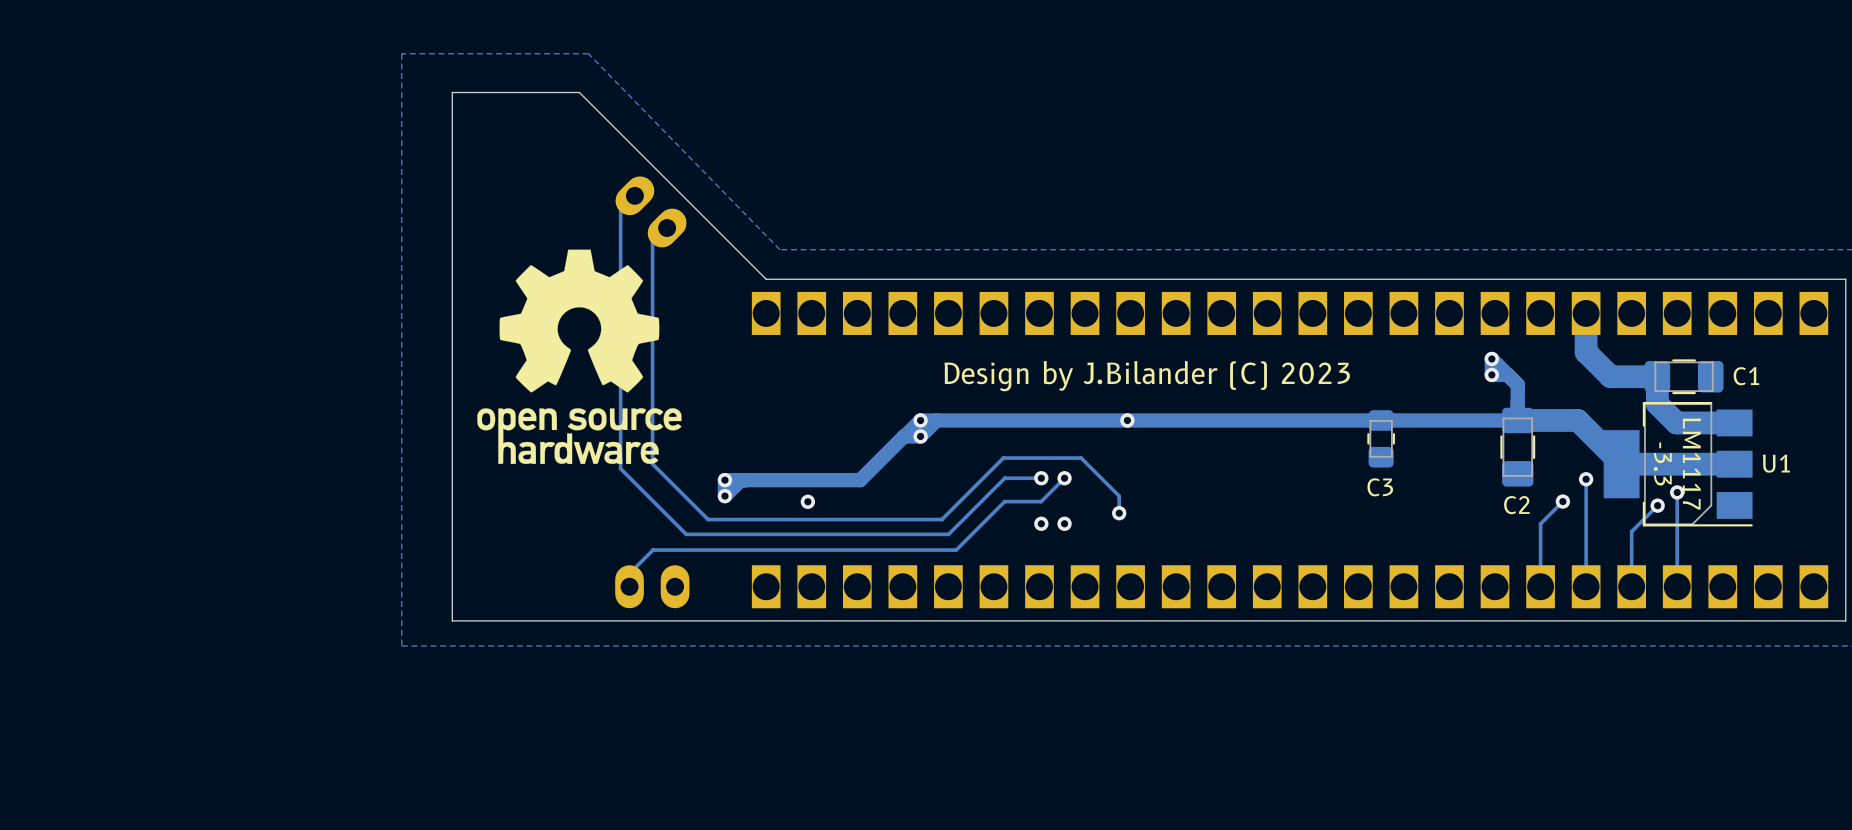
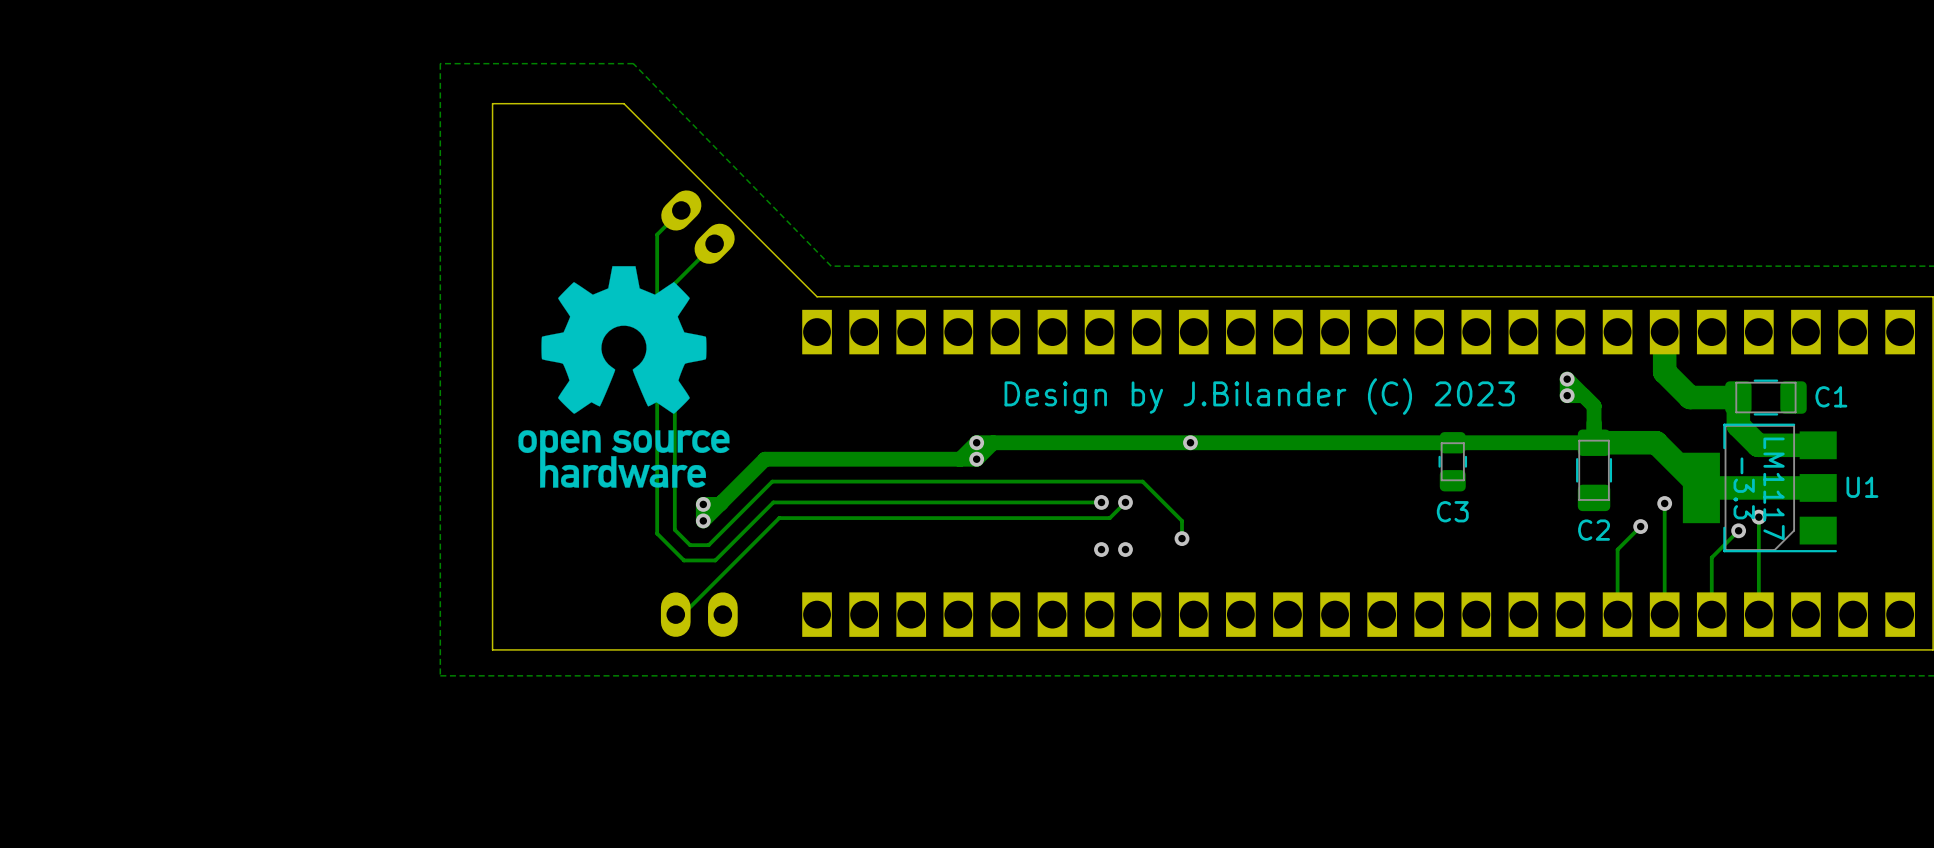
track: (620, 210) (620, 468) (686, 534) (948, 534) (1004, 478) -> (666, 225) (657, 234) (657, 533) (684, 560) (715, 560) (773, 502) (1063, 502)
track: (652, 242) (652, 463) (708, 519) (941, 519) (1003, 458) -> (699, 258) (674, 283) (674, 529) (690, 545) (708, 545) (772, 481) (1062, 481)
track: (903, 436) (860, 480) (724, 480) (724, 496) (740, 480) -> (959, 459) (765, 459) (703, 520) (703, 504) (719, 504)
via: none -> (703, 504)
via: (724, 480) -> none
track: (1049, 493) (1041, 501) (1004, 501) (956, 550) (653, 550) (629, 573) (629, 586) -> (1109, 518) (779, 518) (682, 614) (675, 614)
via: none -> (703, 520)
via: (724, 496) -> none
via: (807, 501) -> none

